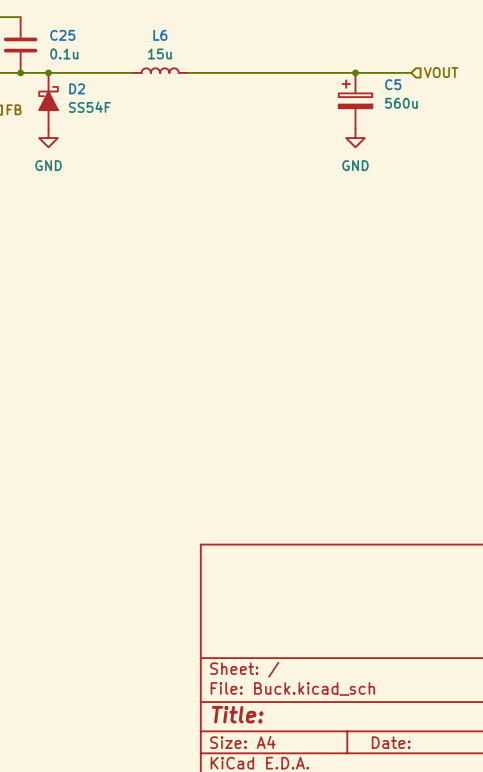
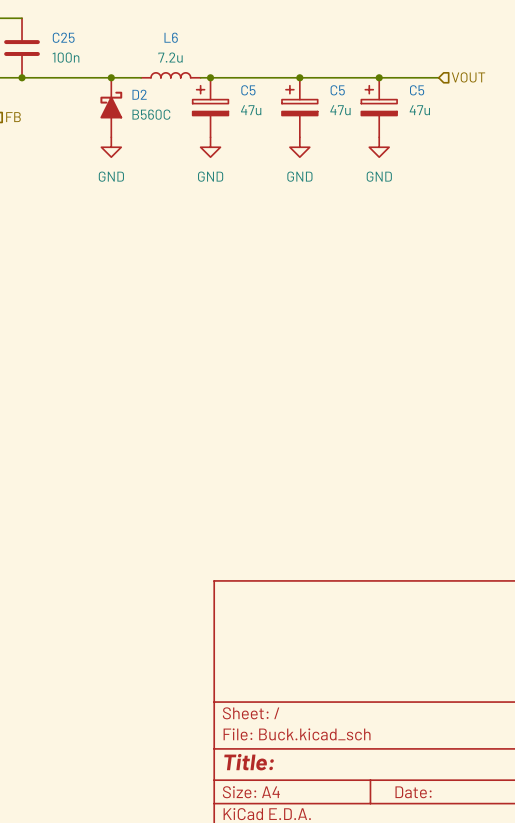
C25 value: 0.1u (64, 53) -> 100n (65, 57)
L6 value: 15u (159, 53) -> 7.2u (170, 57)
junction: (48, 72) -> none
junction: none -> (111, 77)
junction: none -> (210, 77)
junction: none -> (299, 77)
D2 position: (48, 100) -> (111, 107)
C5: none -> 47u (210, 107)
C5: none -> 47u (299, 107)
C5 value: 560u (401, 103) -> 47u (419, 110)
D2 value: SS54F (89, 107) -> B560C (151, 114)
power symbol position: GND (48, 138) -> GND (111, 147)
power symbol: none -> GND (210, 147)
power symbol: none -> GND (299, 147)

